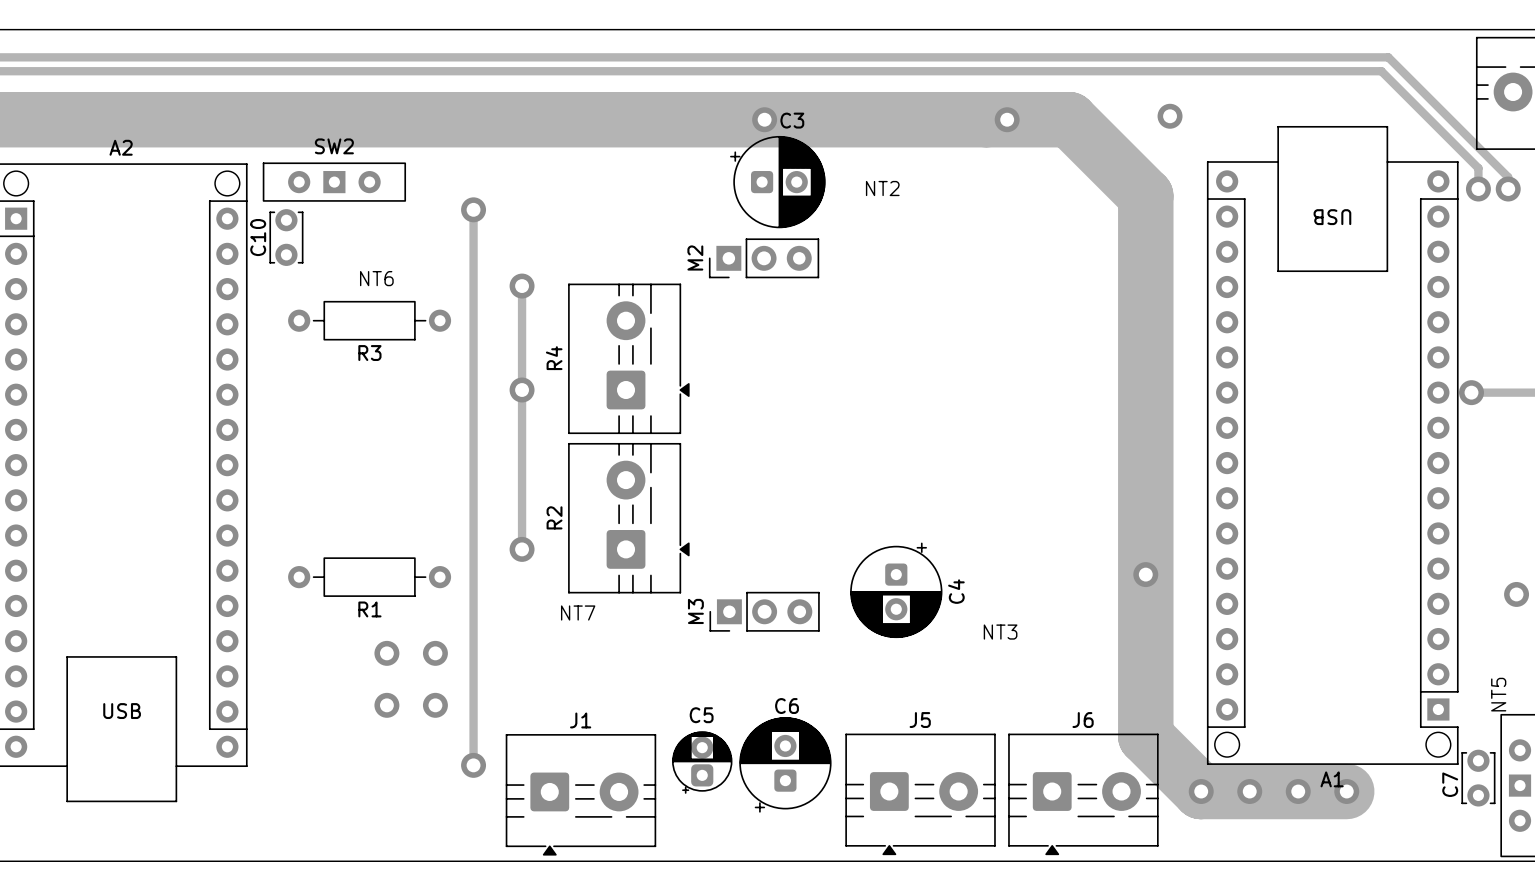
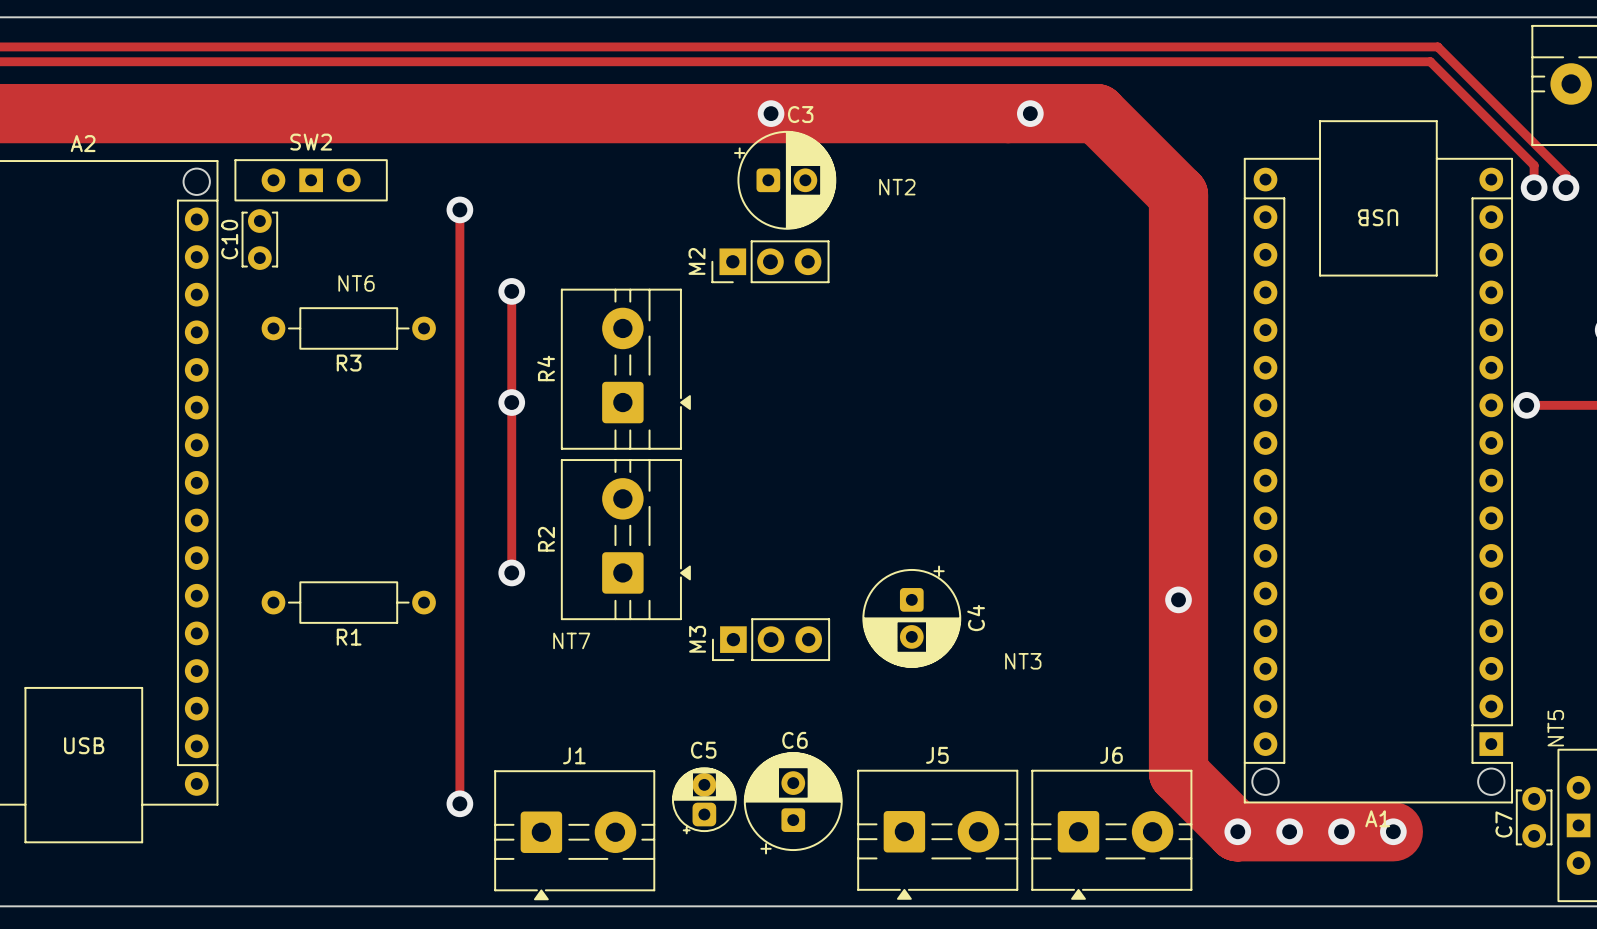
via: (1170, 116) -> none
via: (1516, 594) -> none
via: (386, 653) -> none
via: (435, 653) -> none
via: (386, 705) -> none
via: (435, 705) -> none

